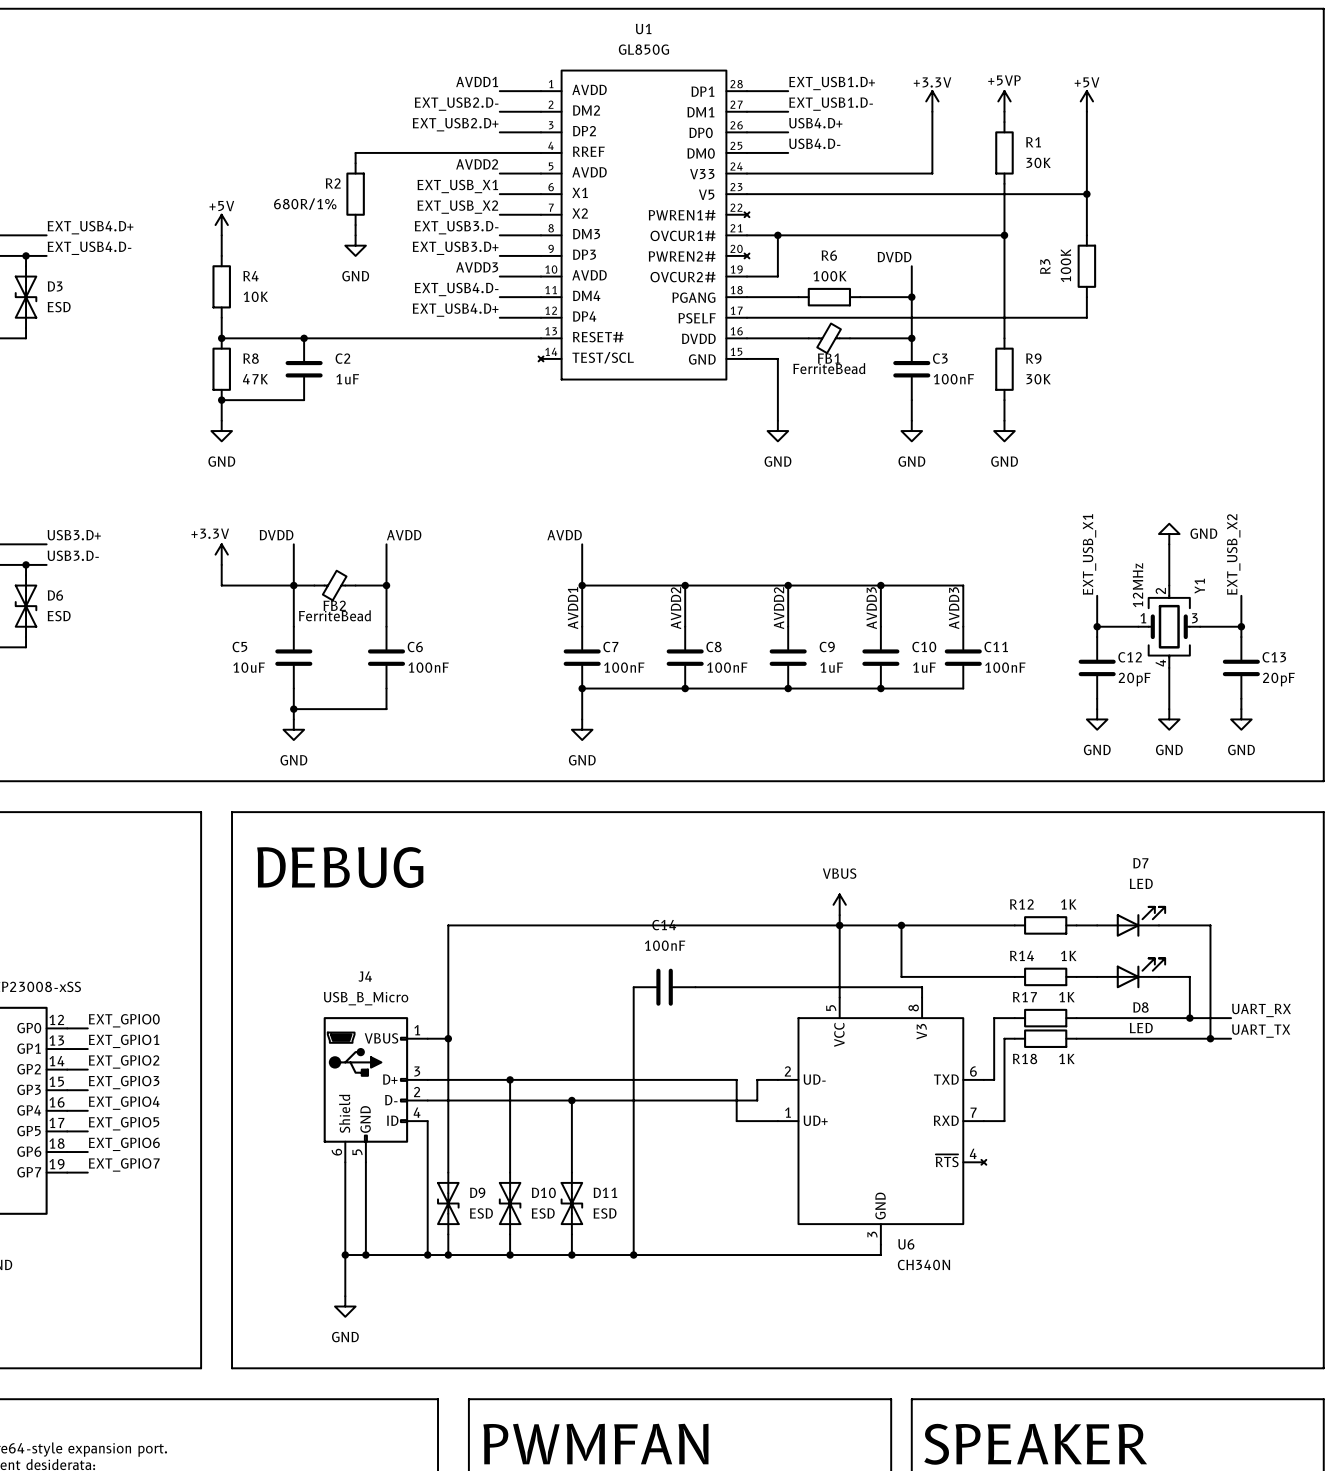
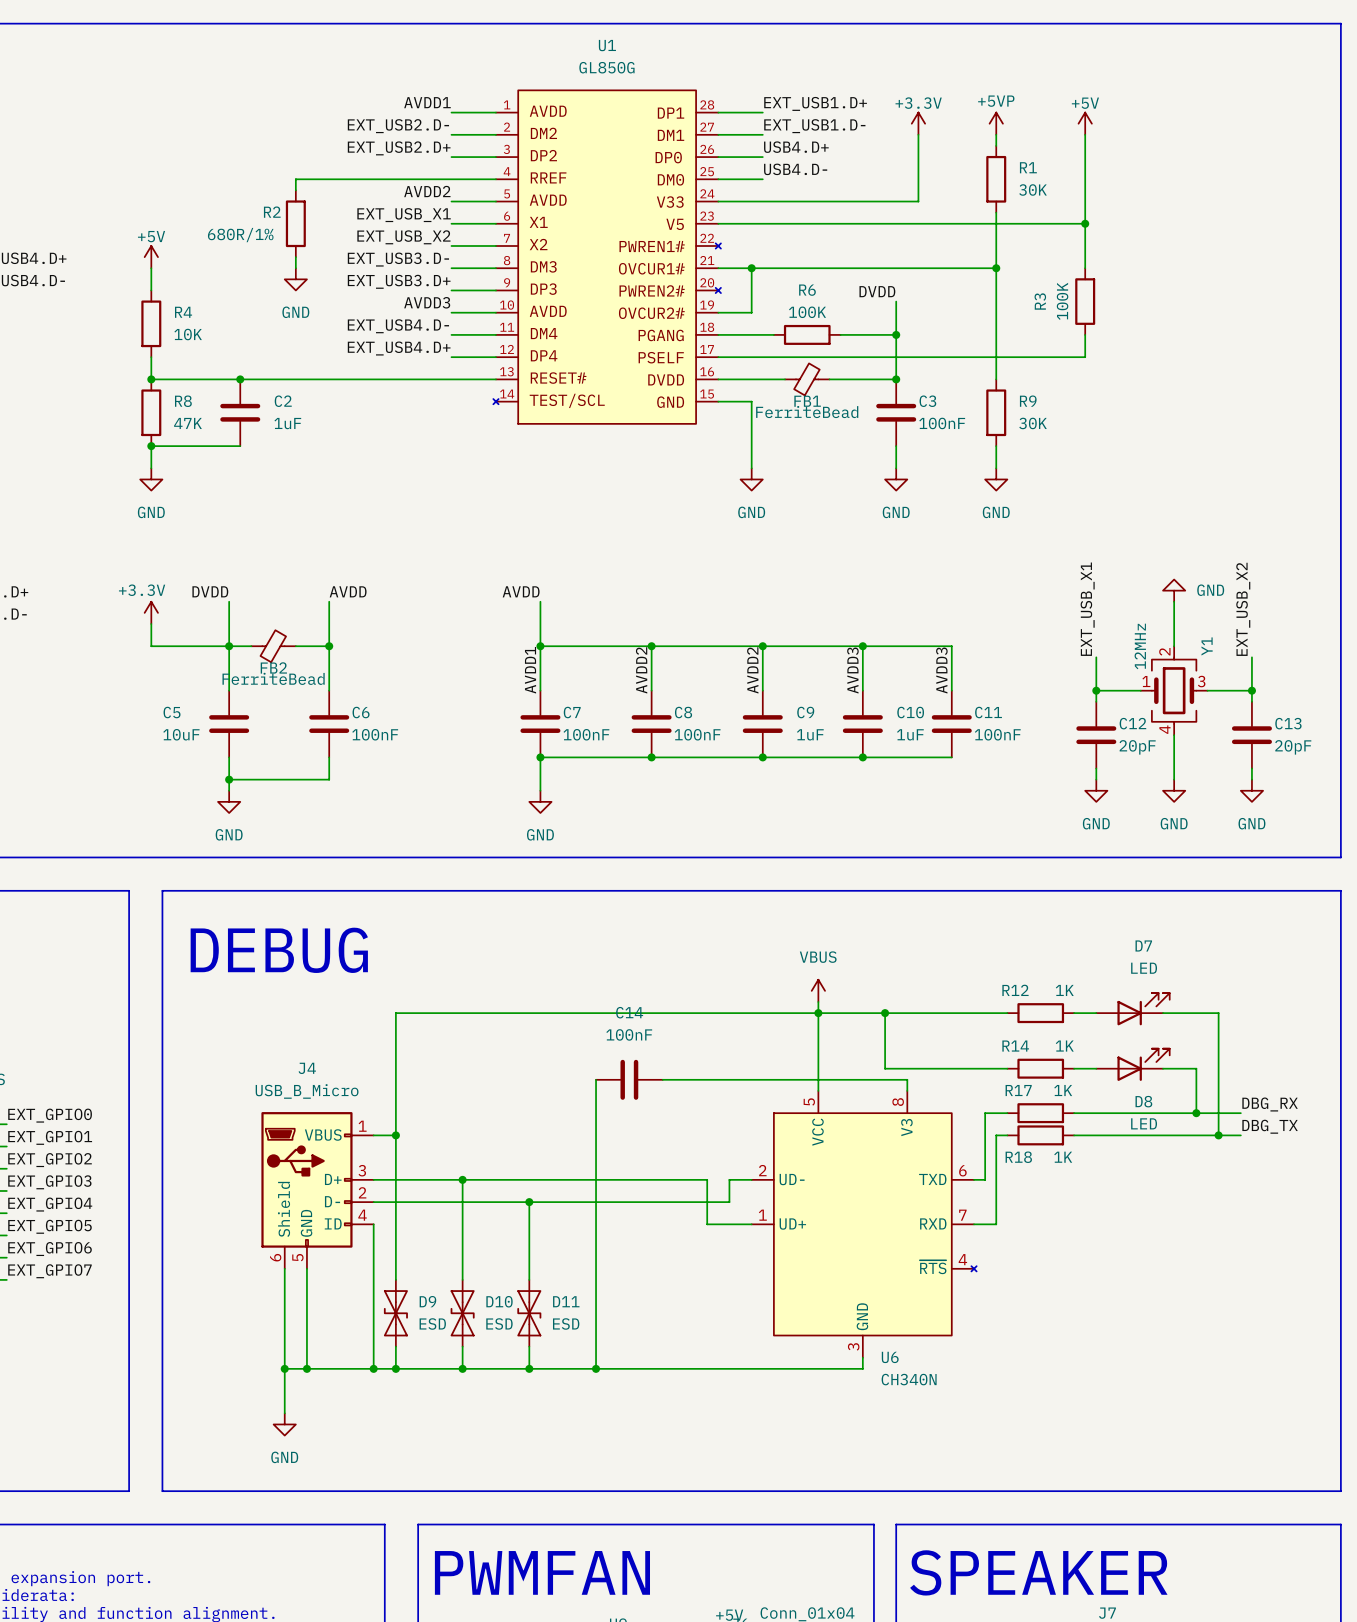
label: UART_RX (1261, 1010) -> DBG_RX (1270, 1104)
label: UART_TX (1261, 1031) -> DBG_TX (1270, 1126)

